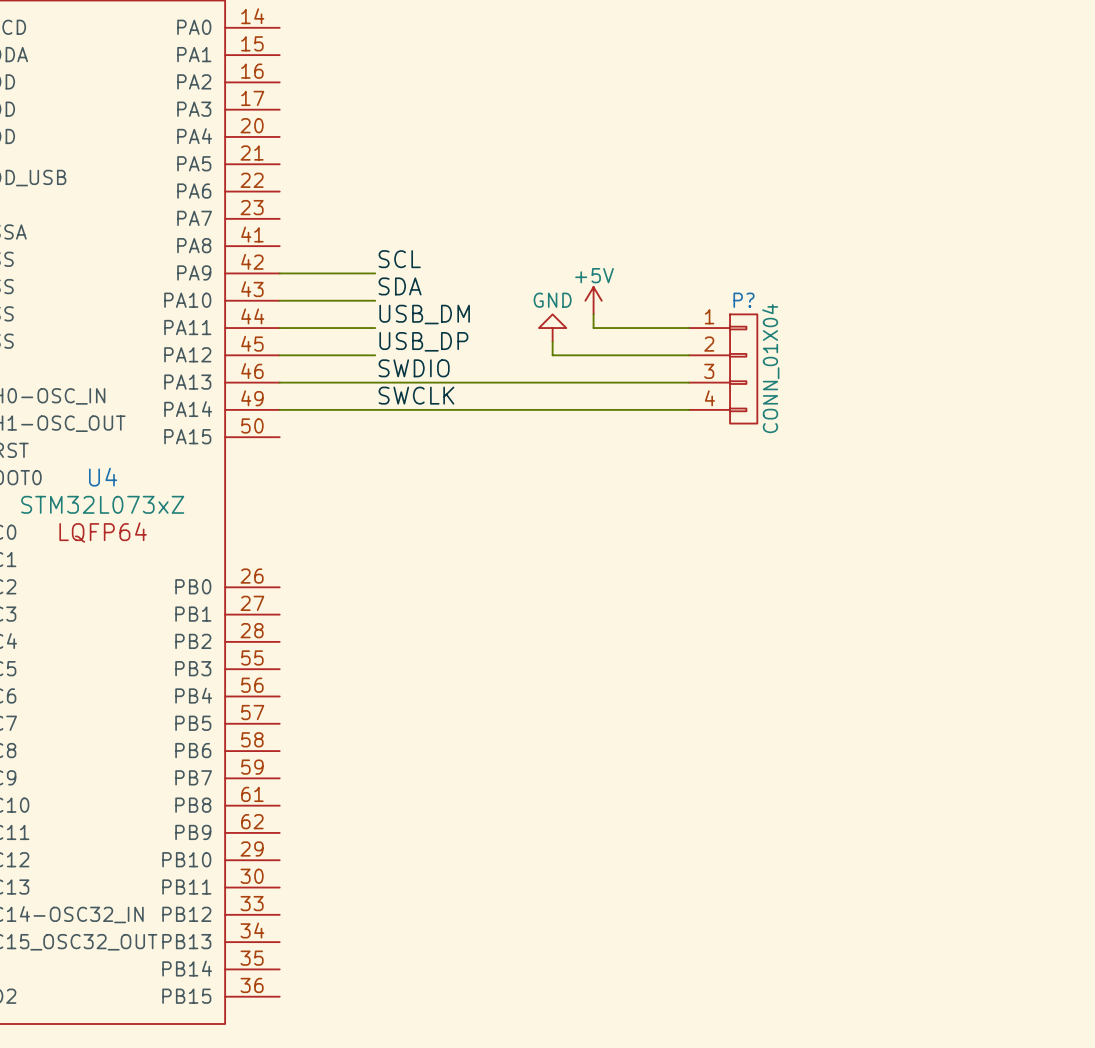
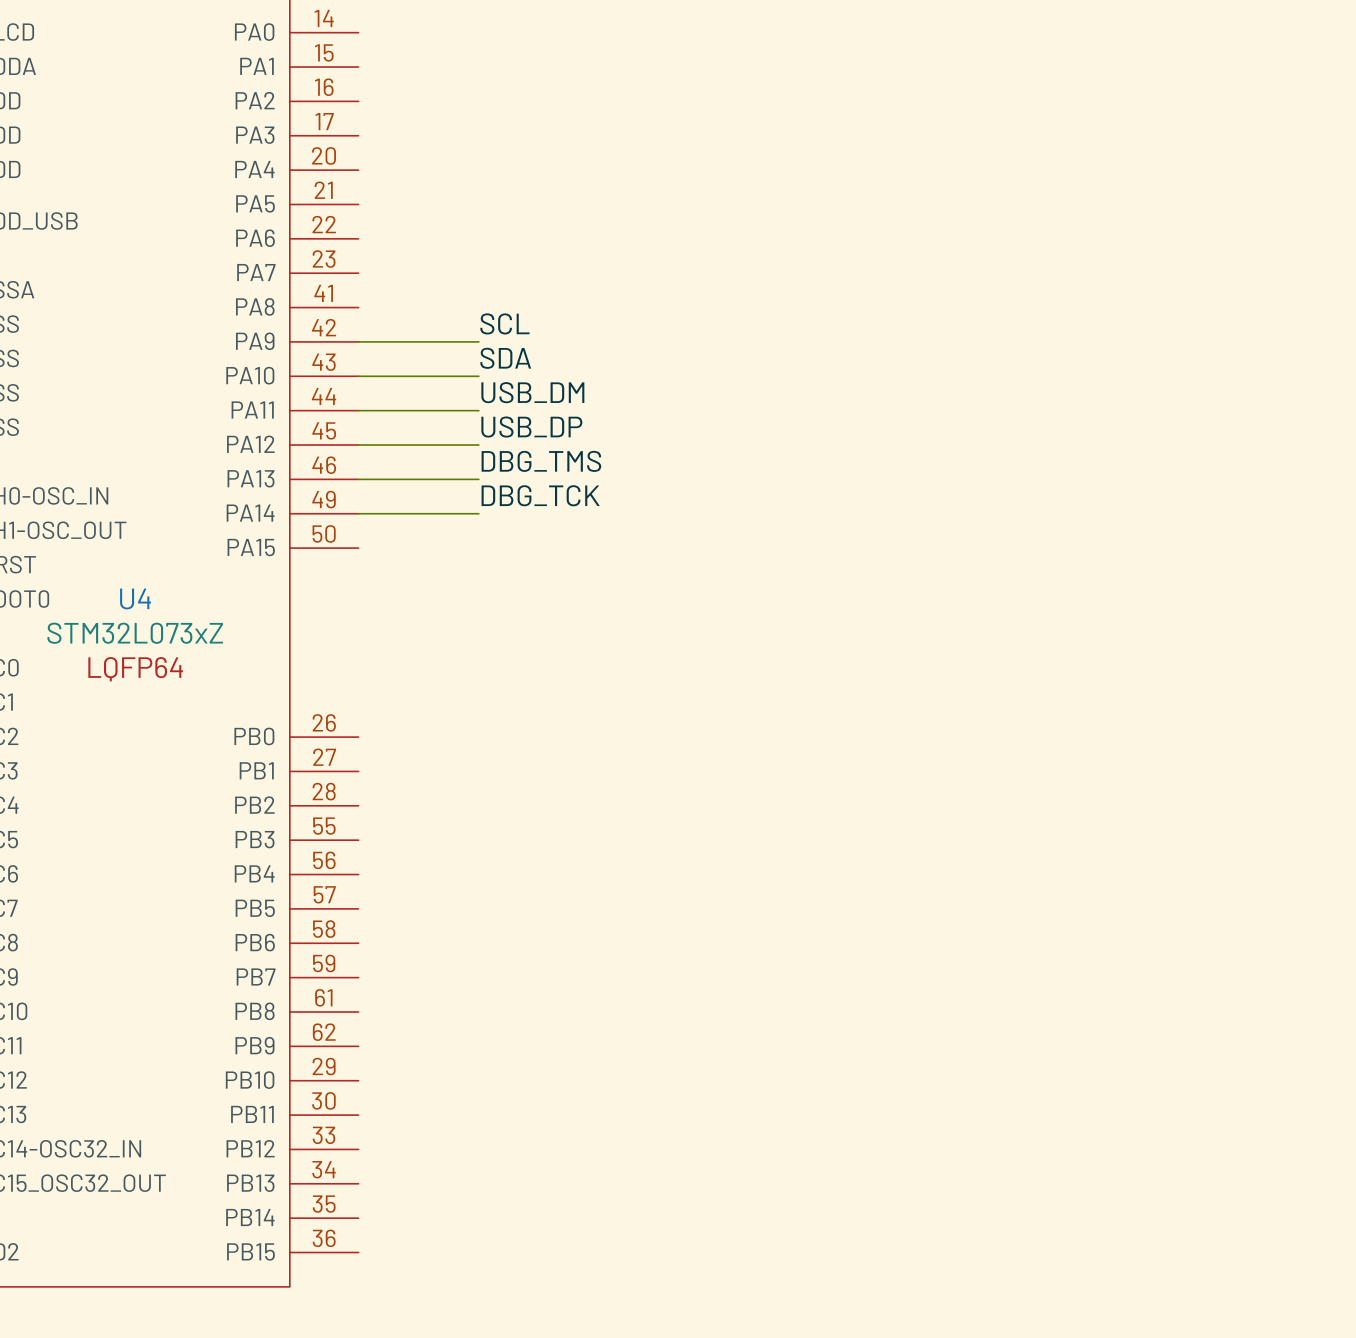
power symbol: +5V (593, 300) -> none
wire: (593, 314) (593, 328) (689, 328) -> none
power symbol: GND (552, 328) -> none
wire: (552, 341) (552, 355) (689, 355) -> none
label: SWDIO (414, 368) -> DBG_TMS (541, 461)
P?: CONN_01X04 (723, 368) -> none
wire: (375, 382) (689, 382) -> none
label: SWCLK (416, 395) -> DBG_TCK (540, 495)
wire: (375, 409) (689, 409) -> none

